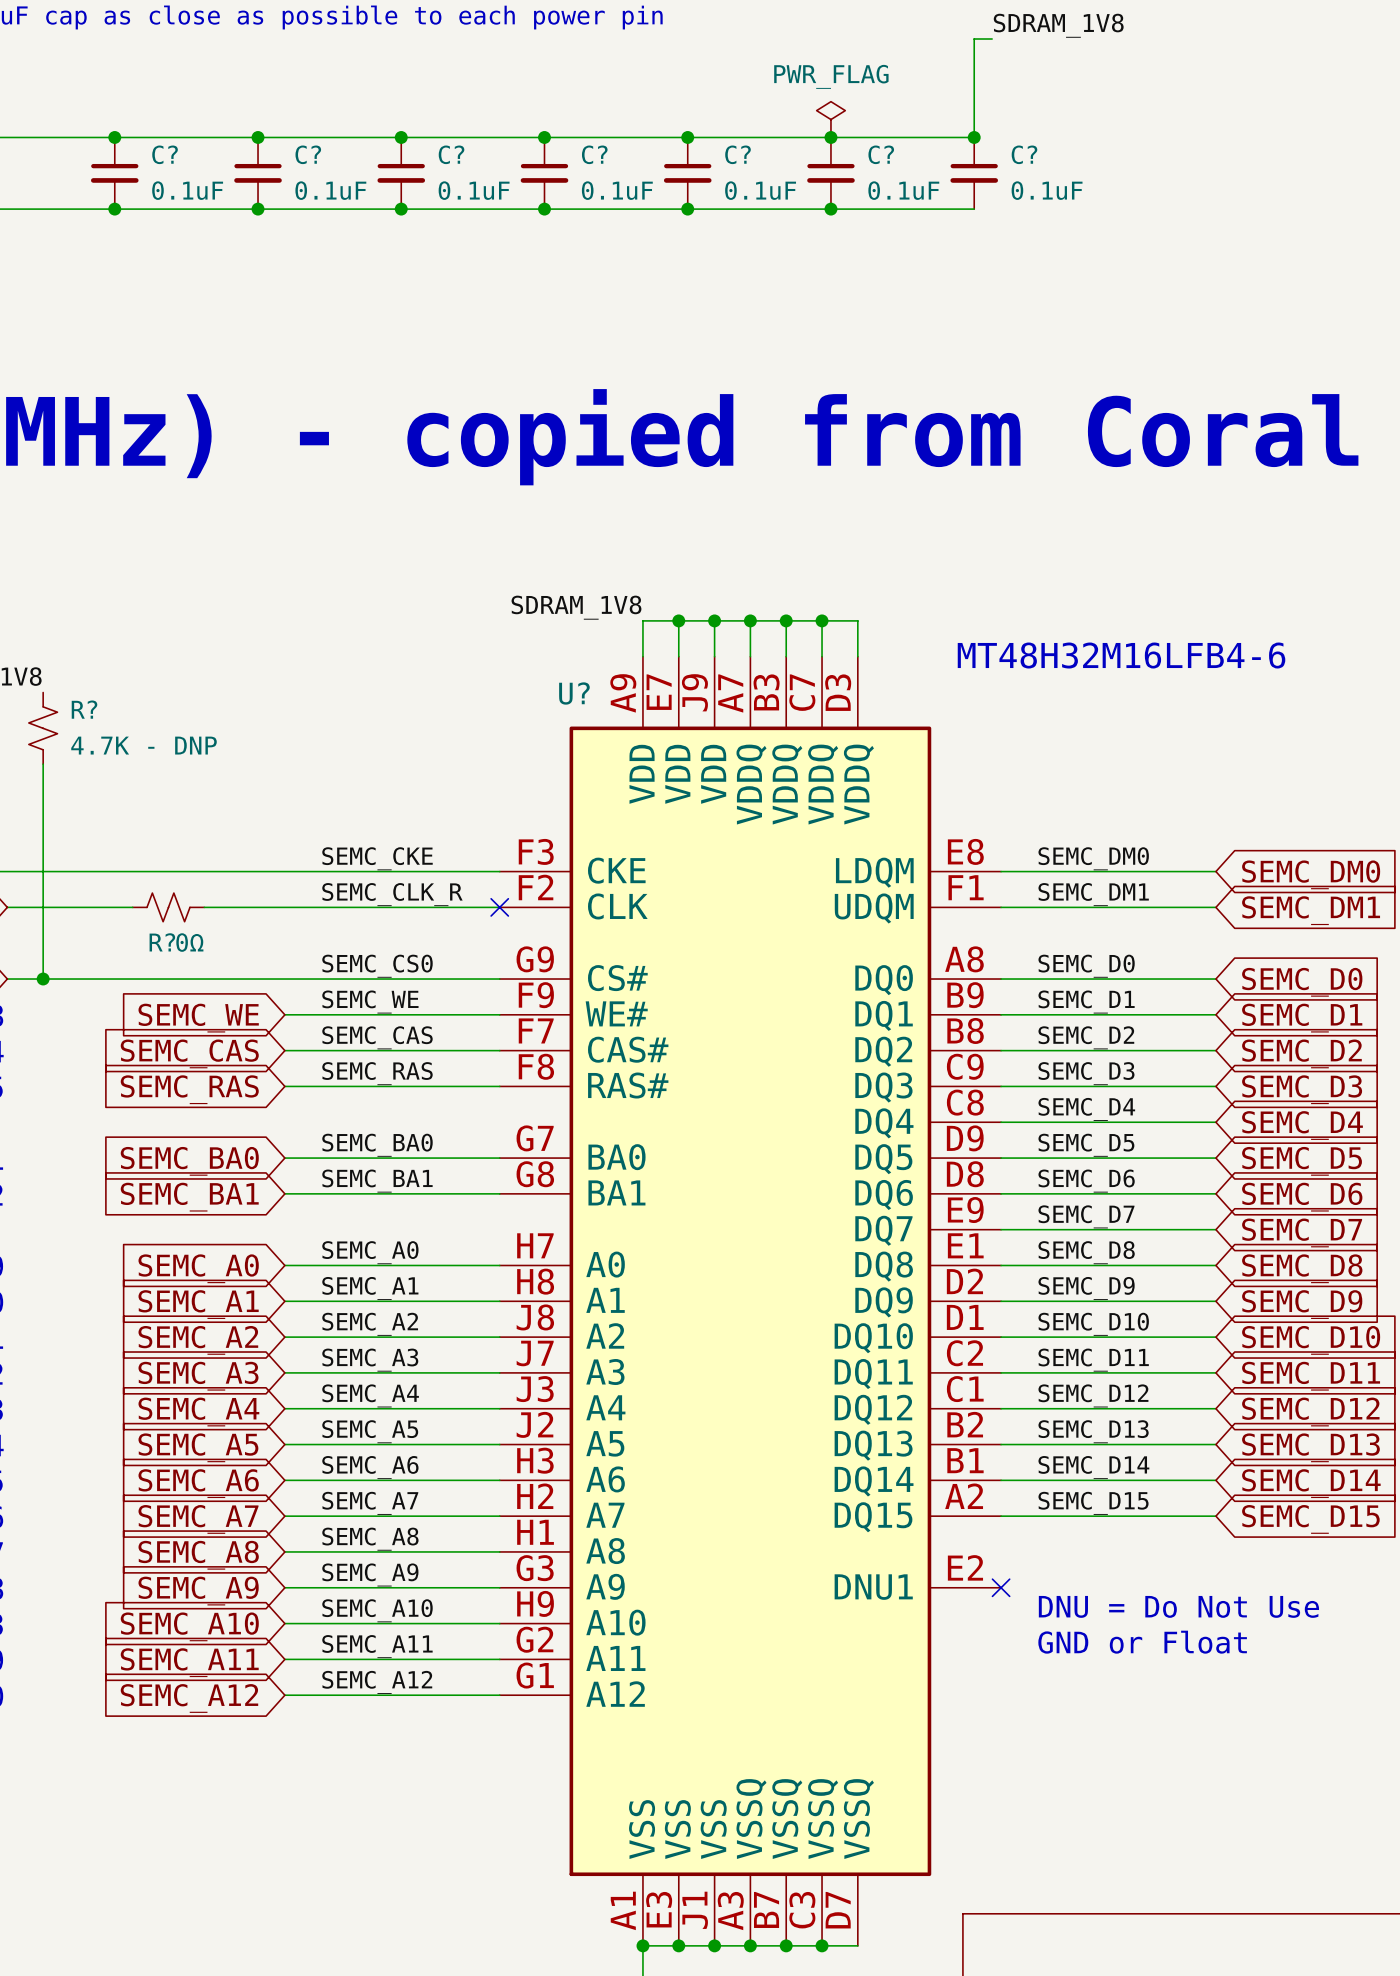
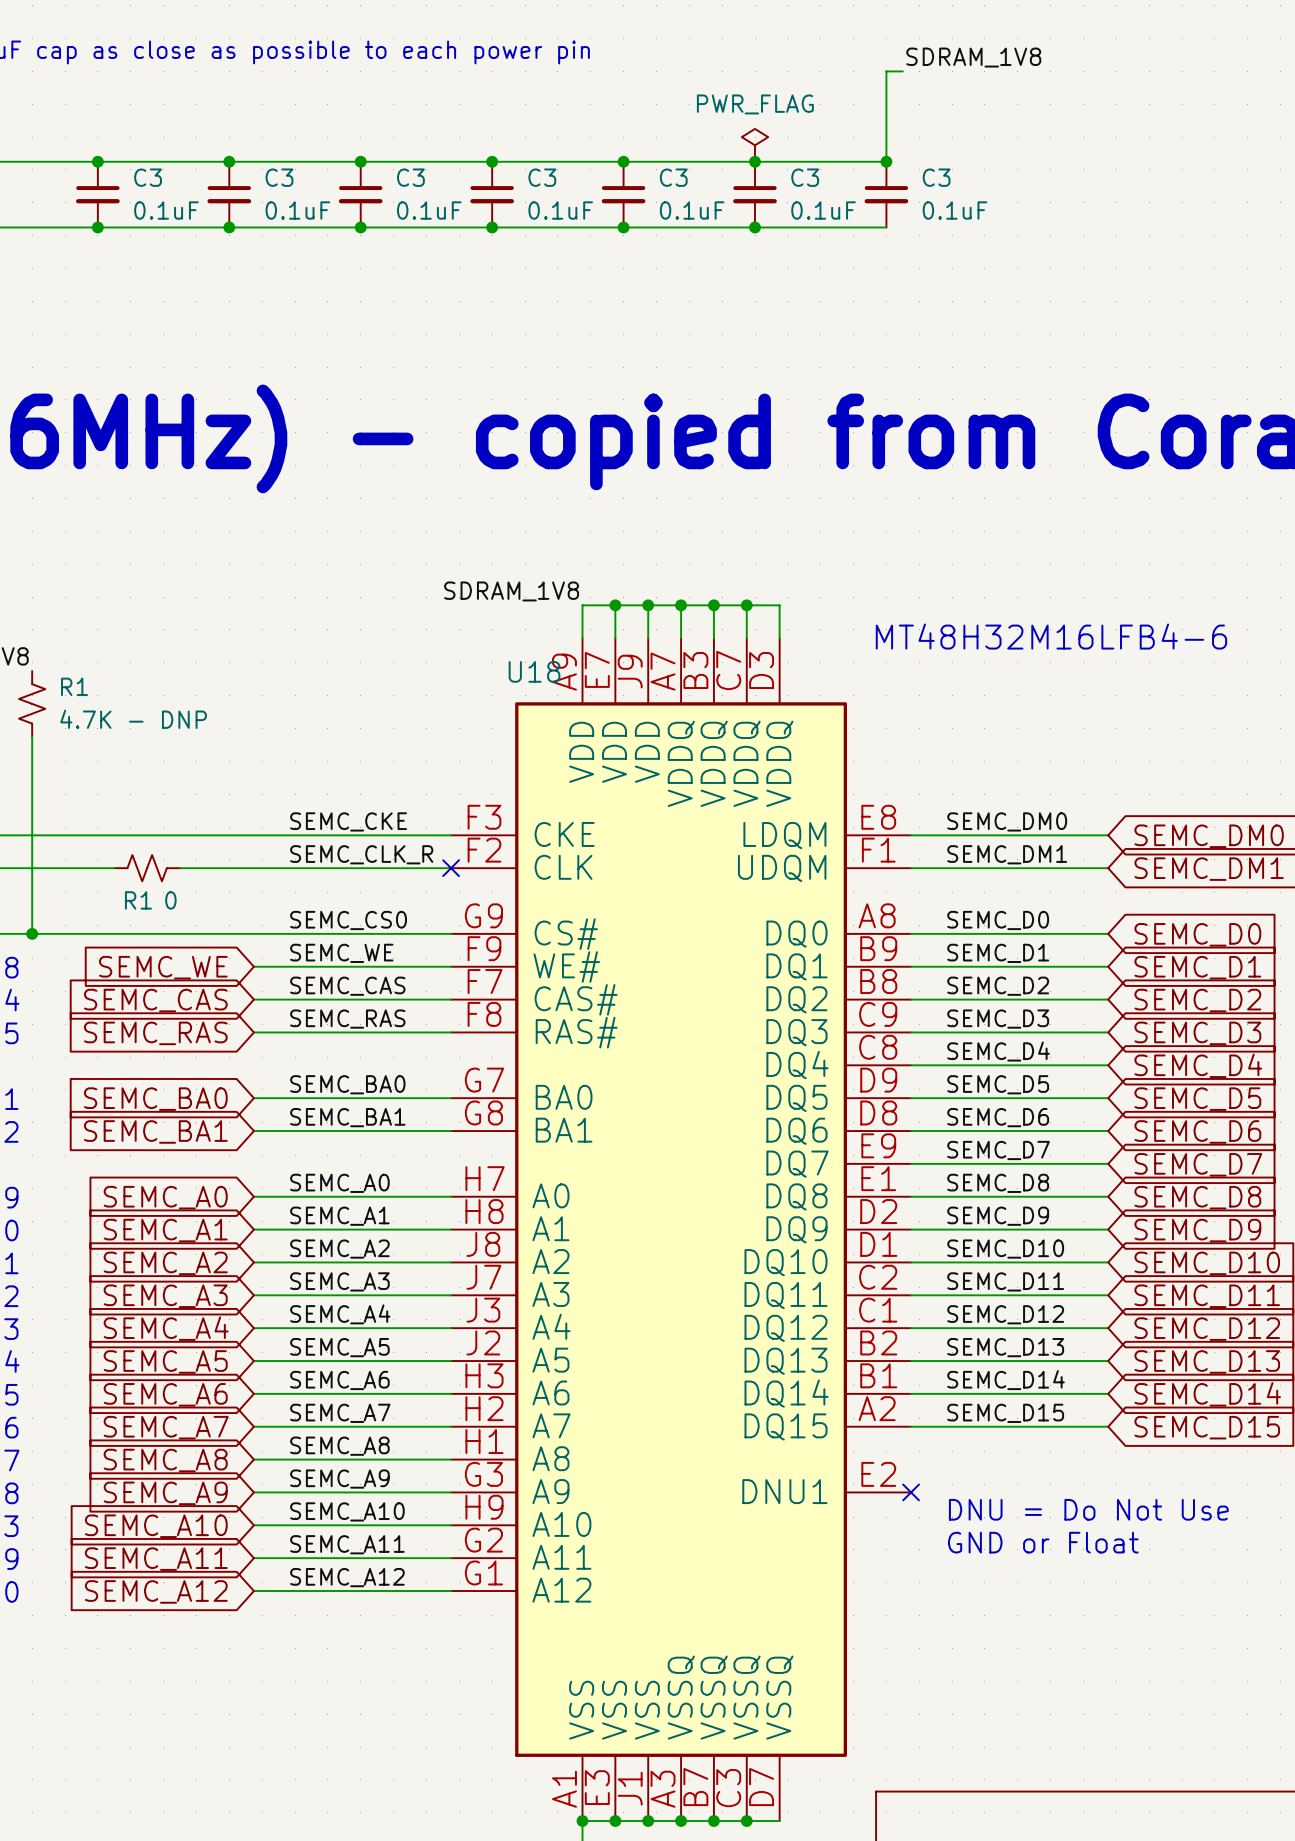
C? name: C? (165, 154) -> C3 (148, 177)
C? name: C? (308, 154) -> C3 (279, 177)
C? name: C? (451, 154) -> C3 (410, 177)
C? name: C? (594, 154) -> C3 (542, 177)
C? name: C? (738, 154) -> C3 (673, 177)
C? name: C? (881, 154) -> C3 (805, 177)
C? name: C? (1024, 154) -> C3 (936, 177)
U? name: U? (574, 693) -> U18 (534, 671)
R? name: R? (84, 709) -> R1 (74, 686)
R? name: R? (162, 942) -> R1 (138, 900)
R? value: 0Ω (189, 942) -> 0 (170, 900)

